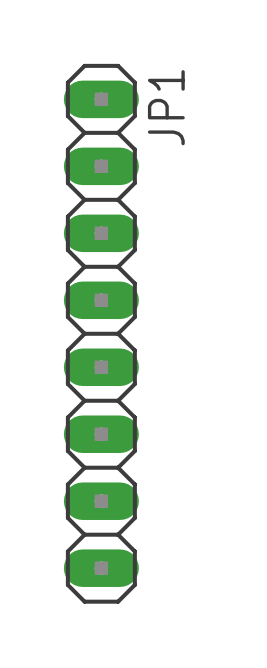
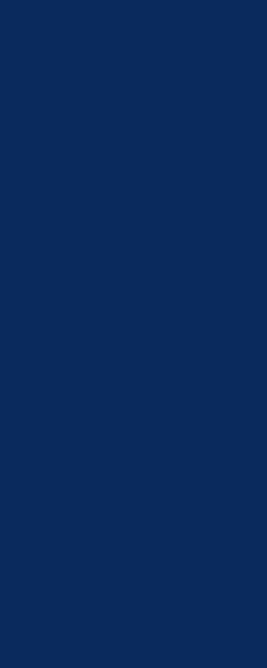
JP1: (101, 333) -> none

